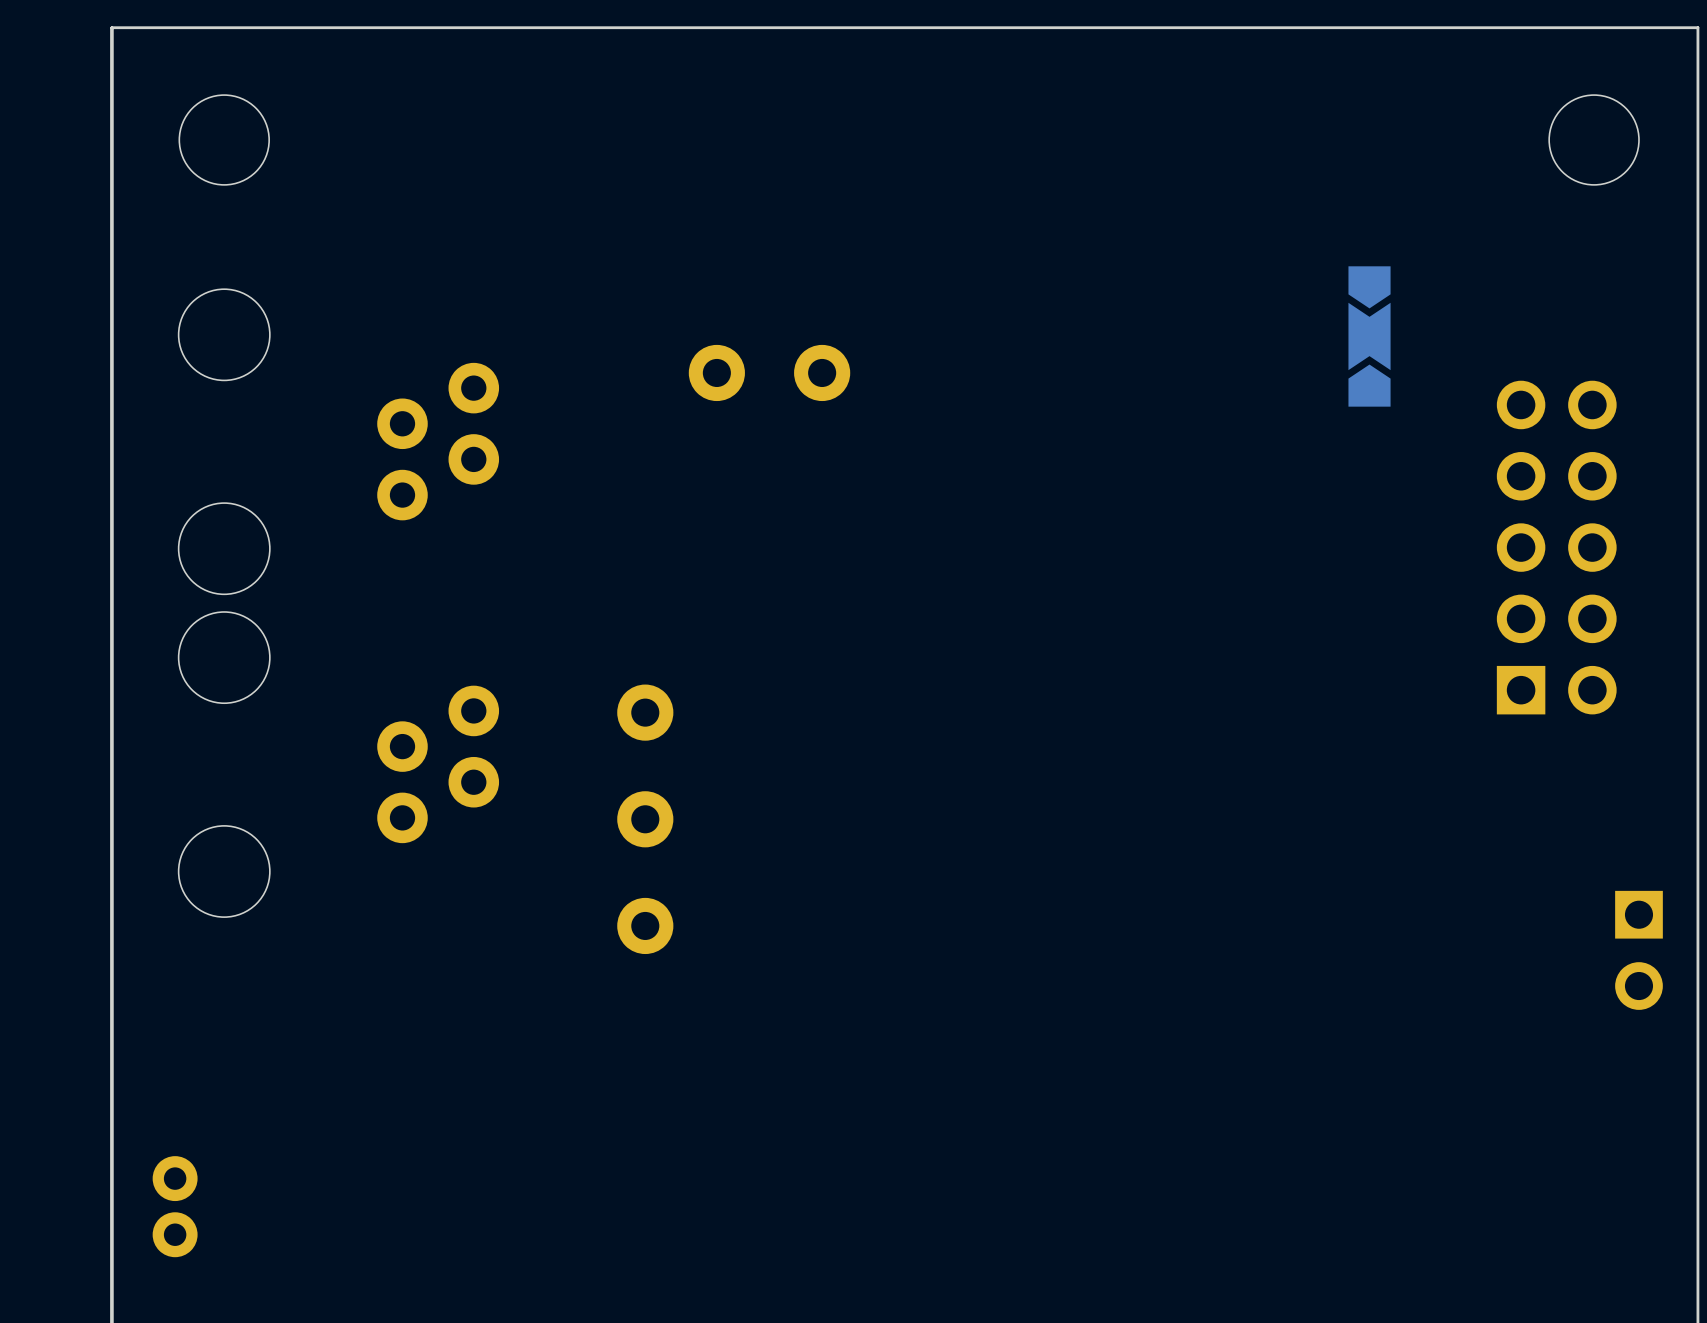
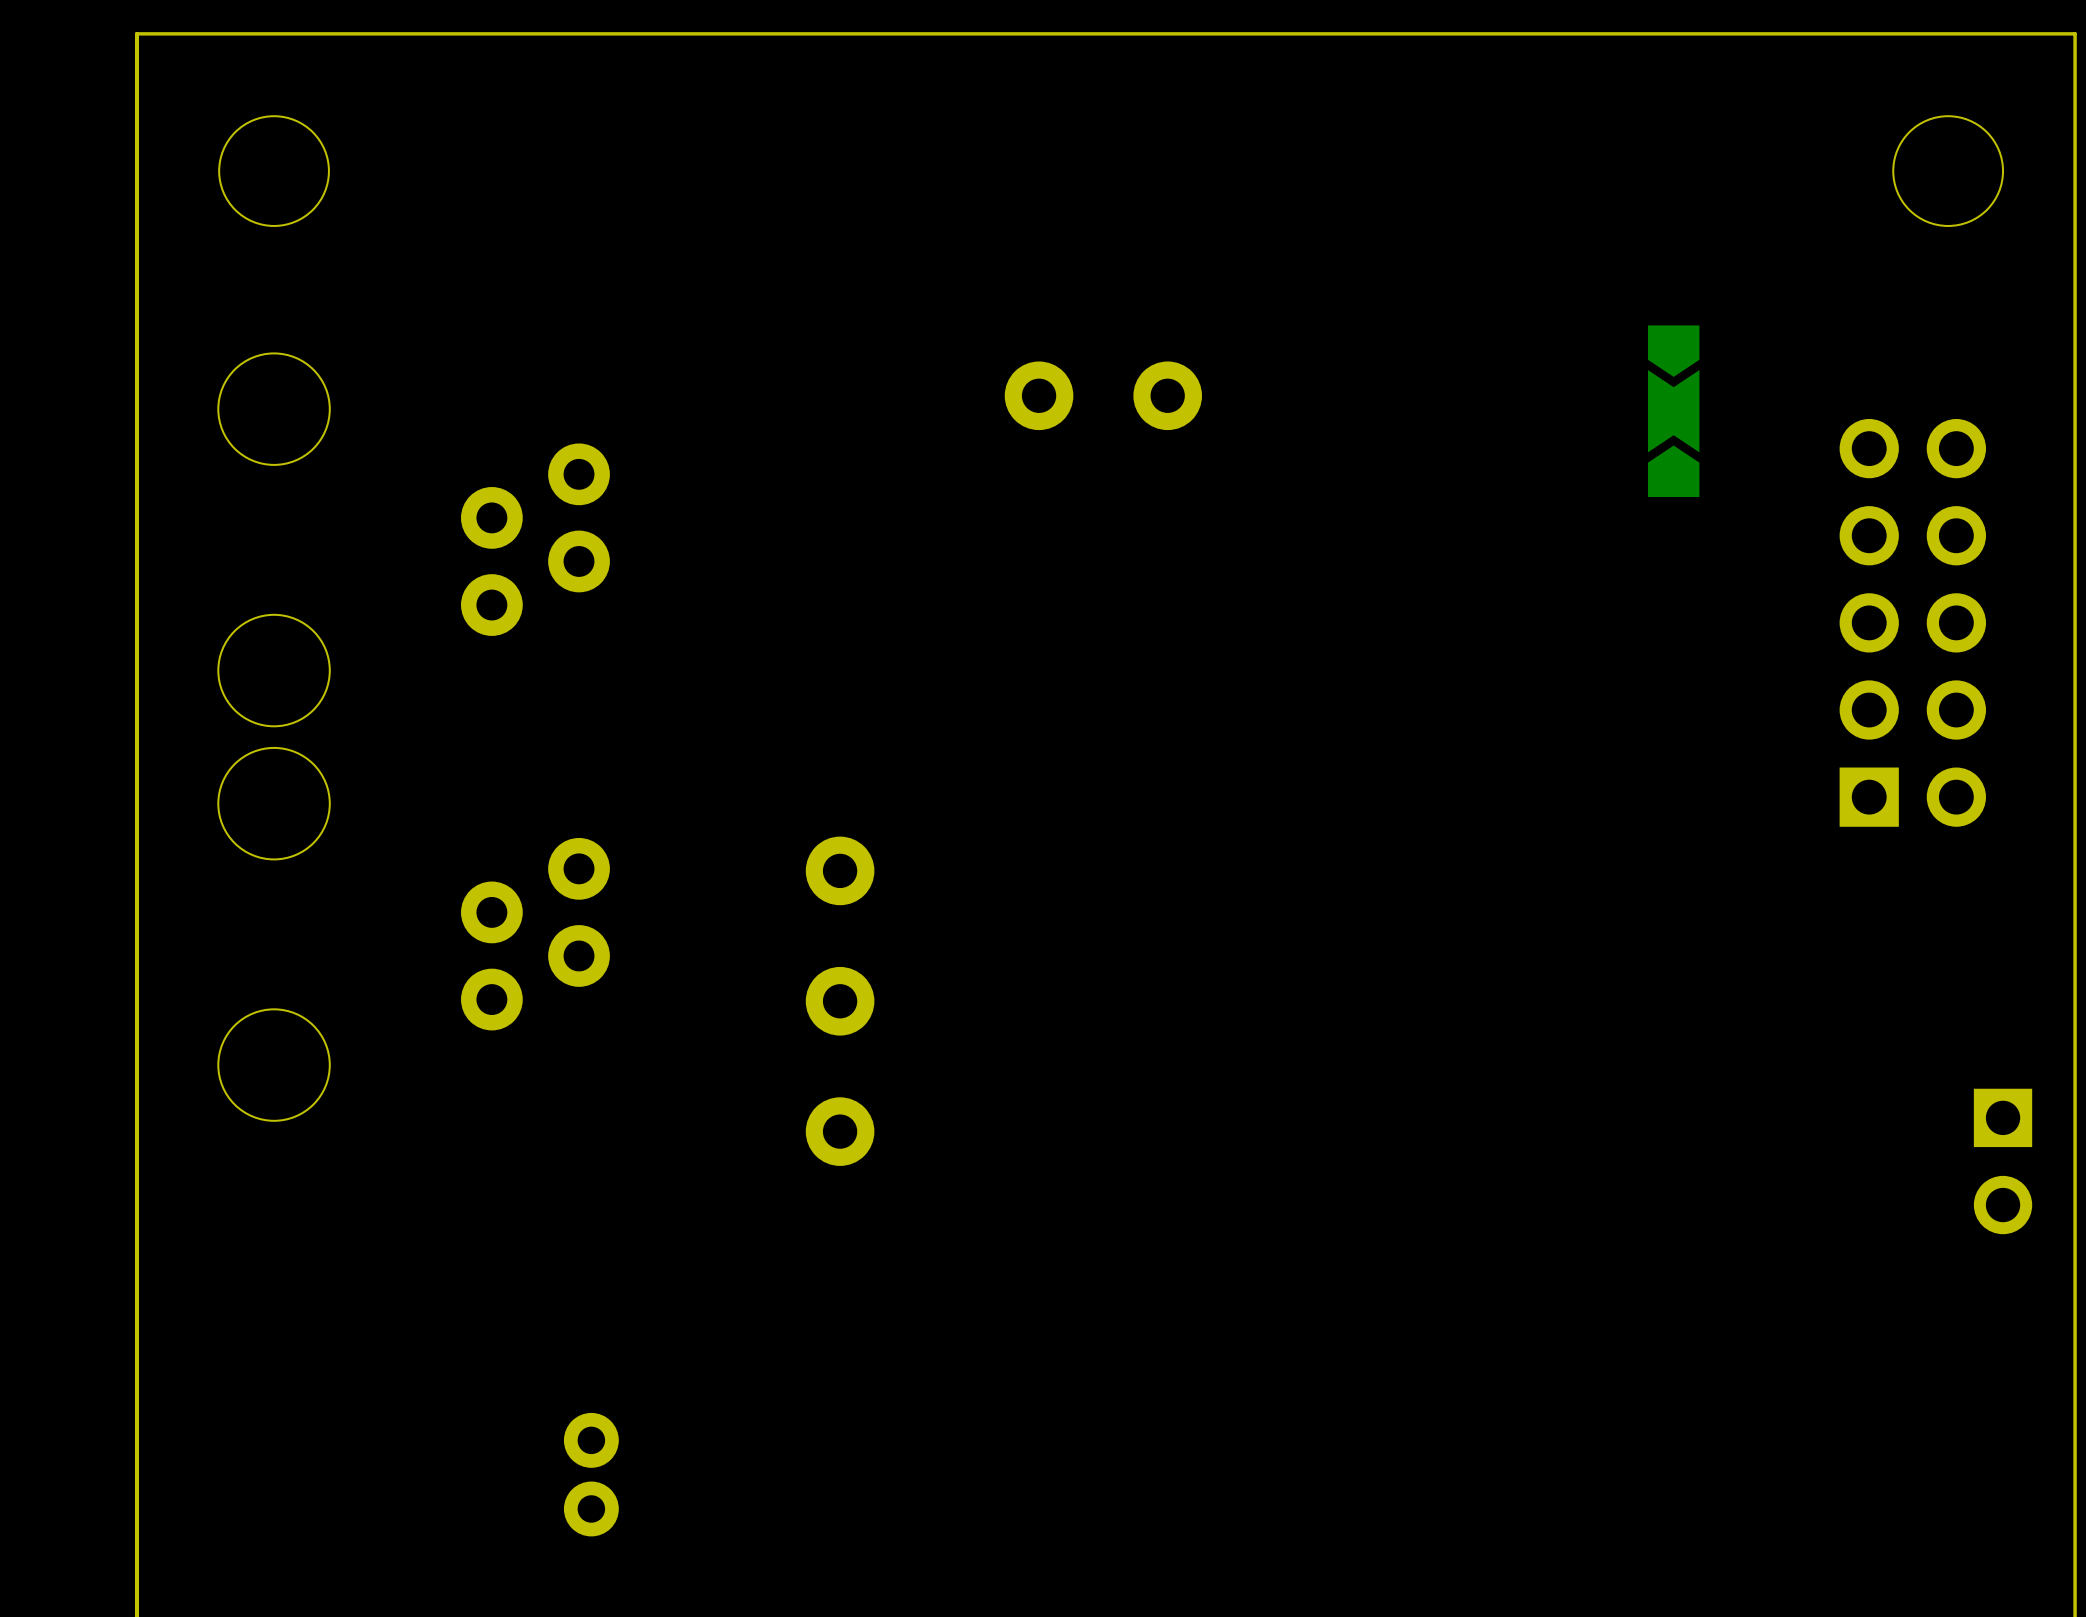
part: none -> (1167, 395)
part: (716, 372) -> none
part position: (822, 372) -> (1039, 395)
part position: (1556, 547) -> (1912, 622)
part position: (645, 712) -> (840, 870)
part position: (645, 819) -> (840, 1001)
part position: (645, 925) -> (840, 1131)
part position: (175, 1206) -> (591, 1474)

